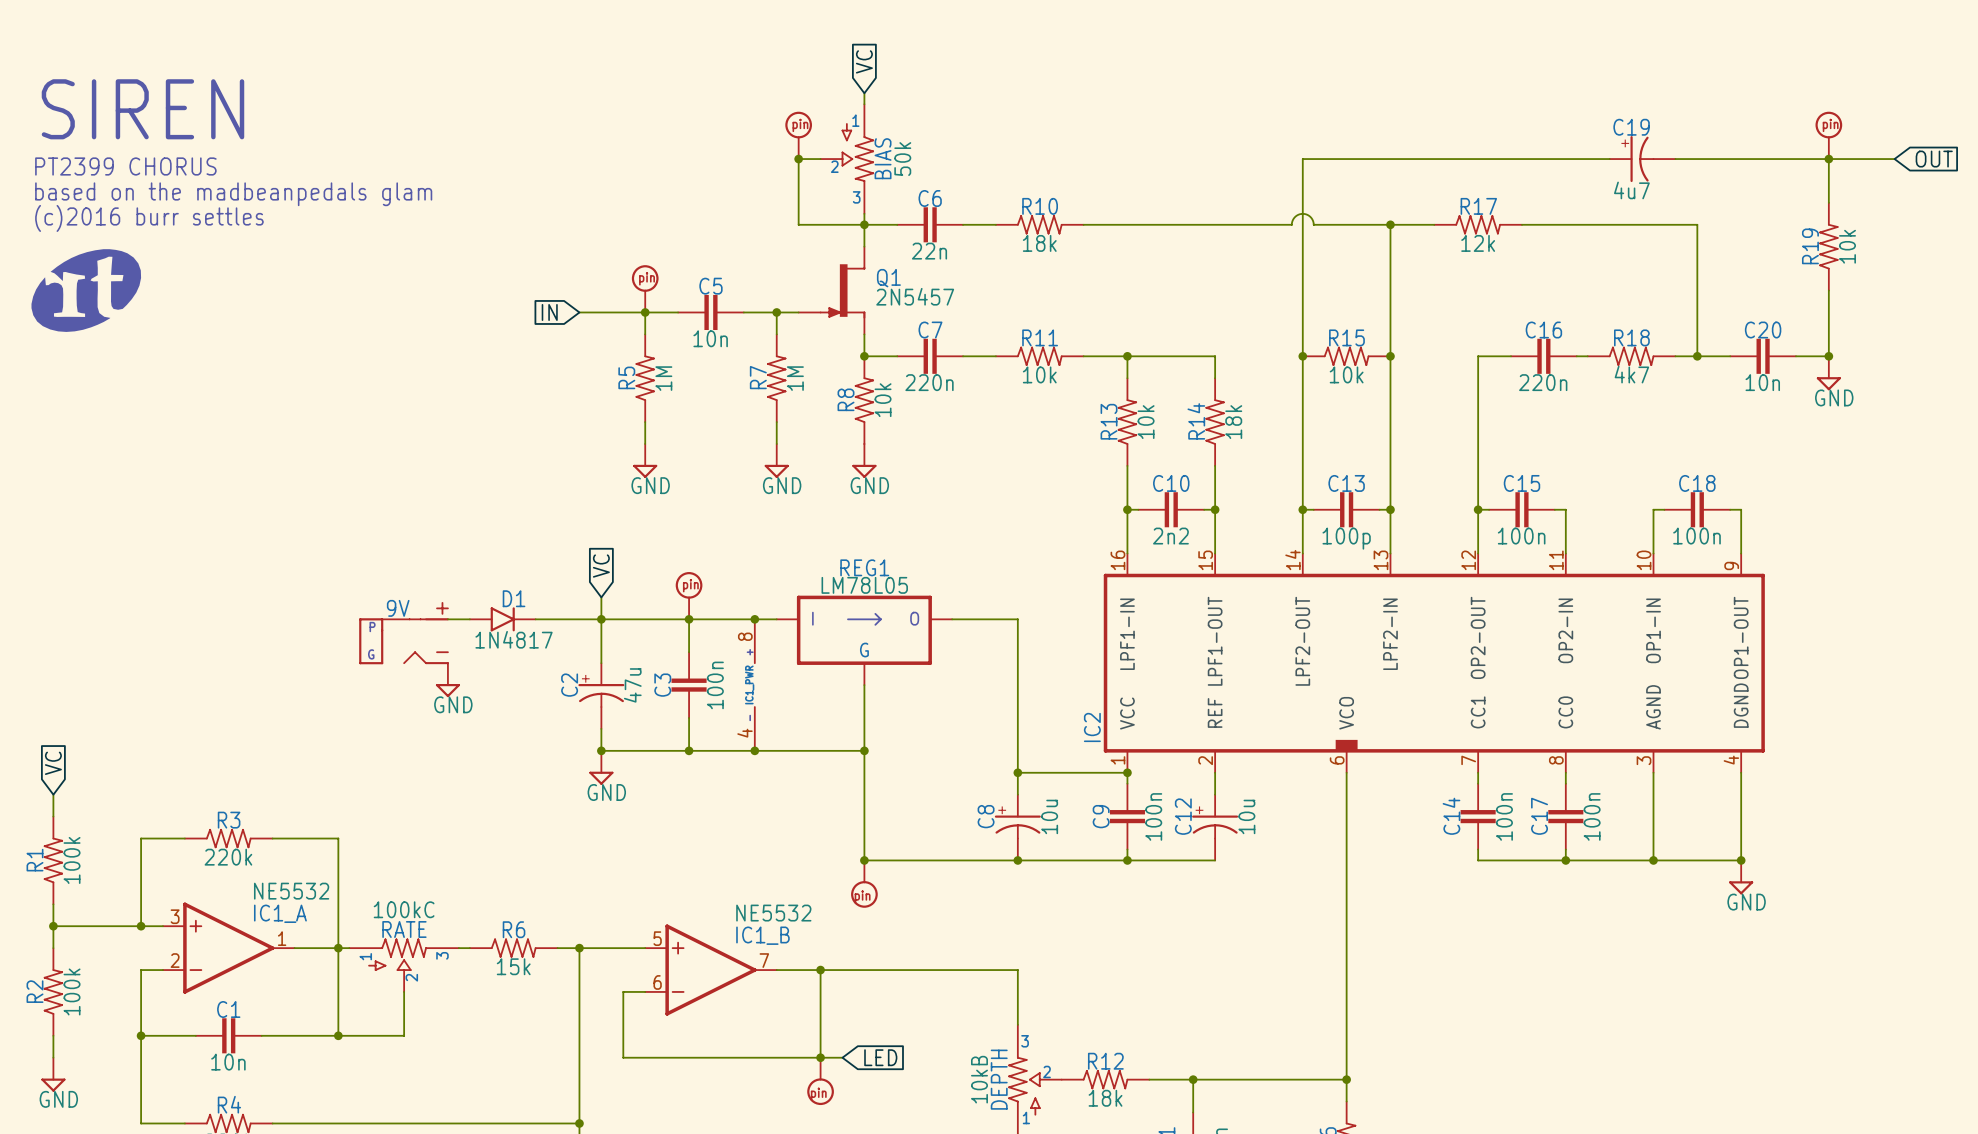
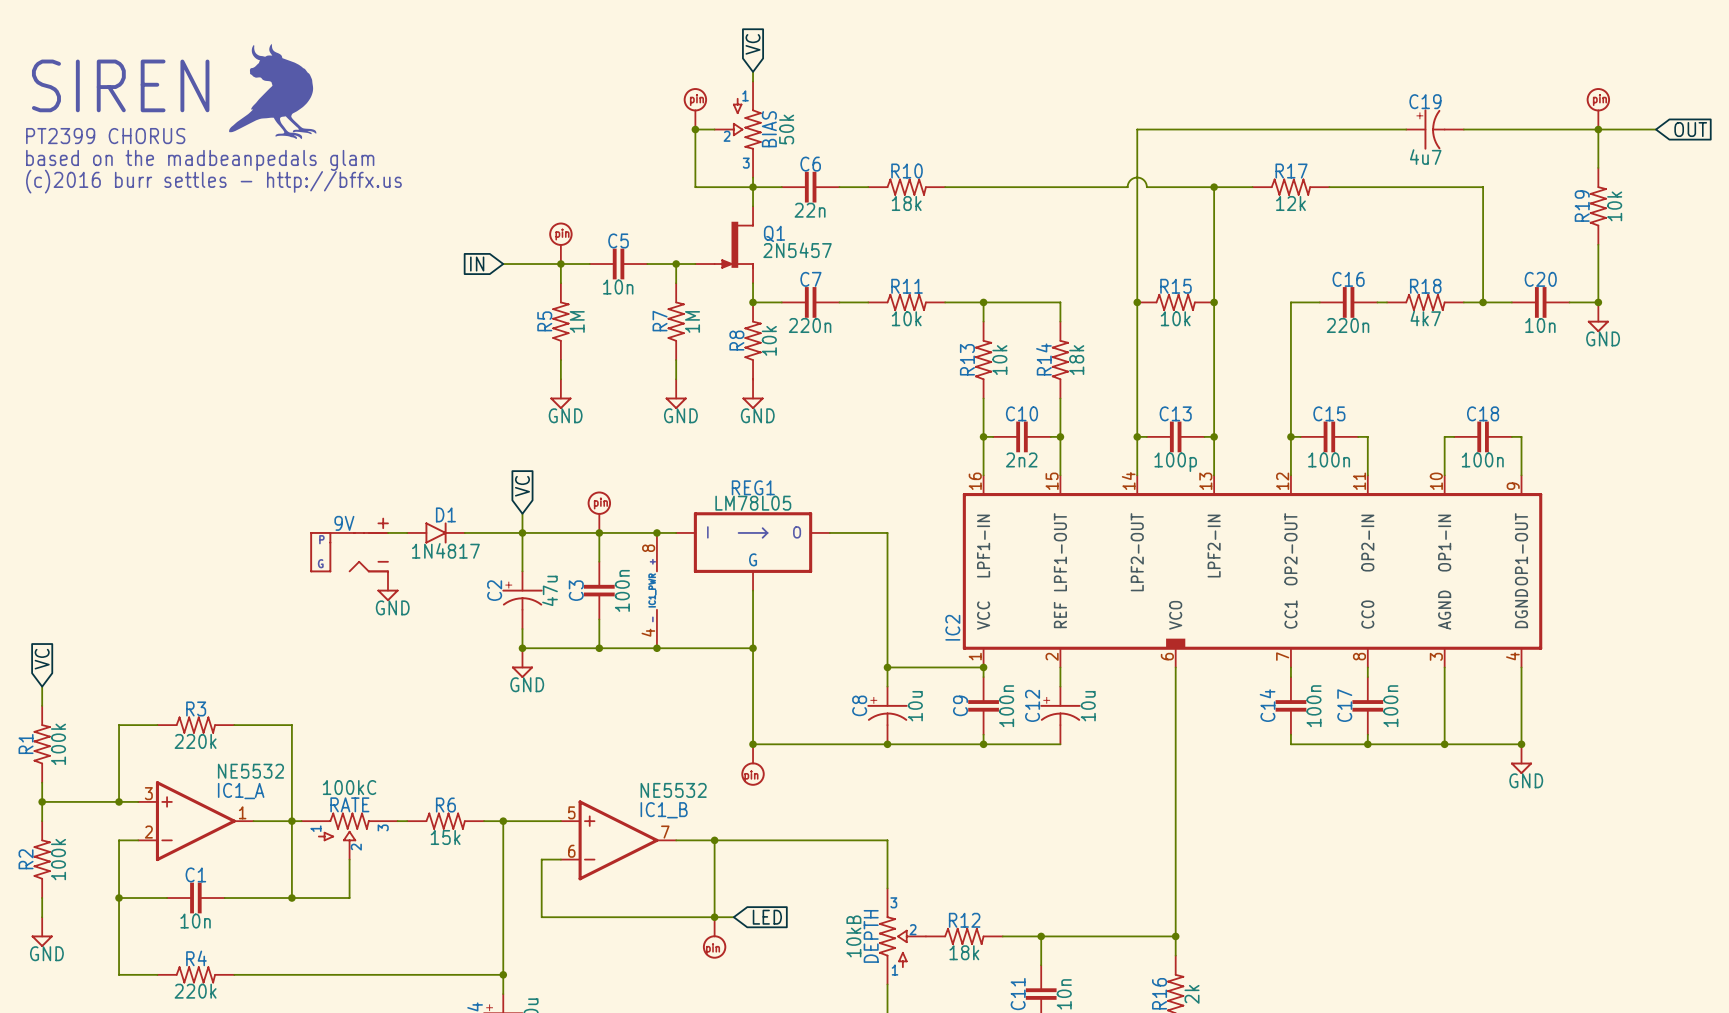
part: none -> (272, 91)
text: (c)2016 burr settles (149, 218) -> (c)2016 burr settles - http://bffx.us (213, 181)
part: (86, 290) -> none

